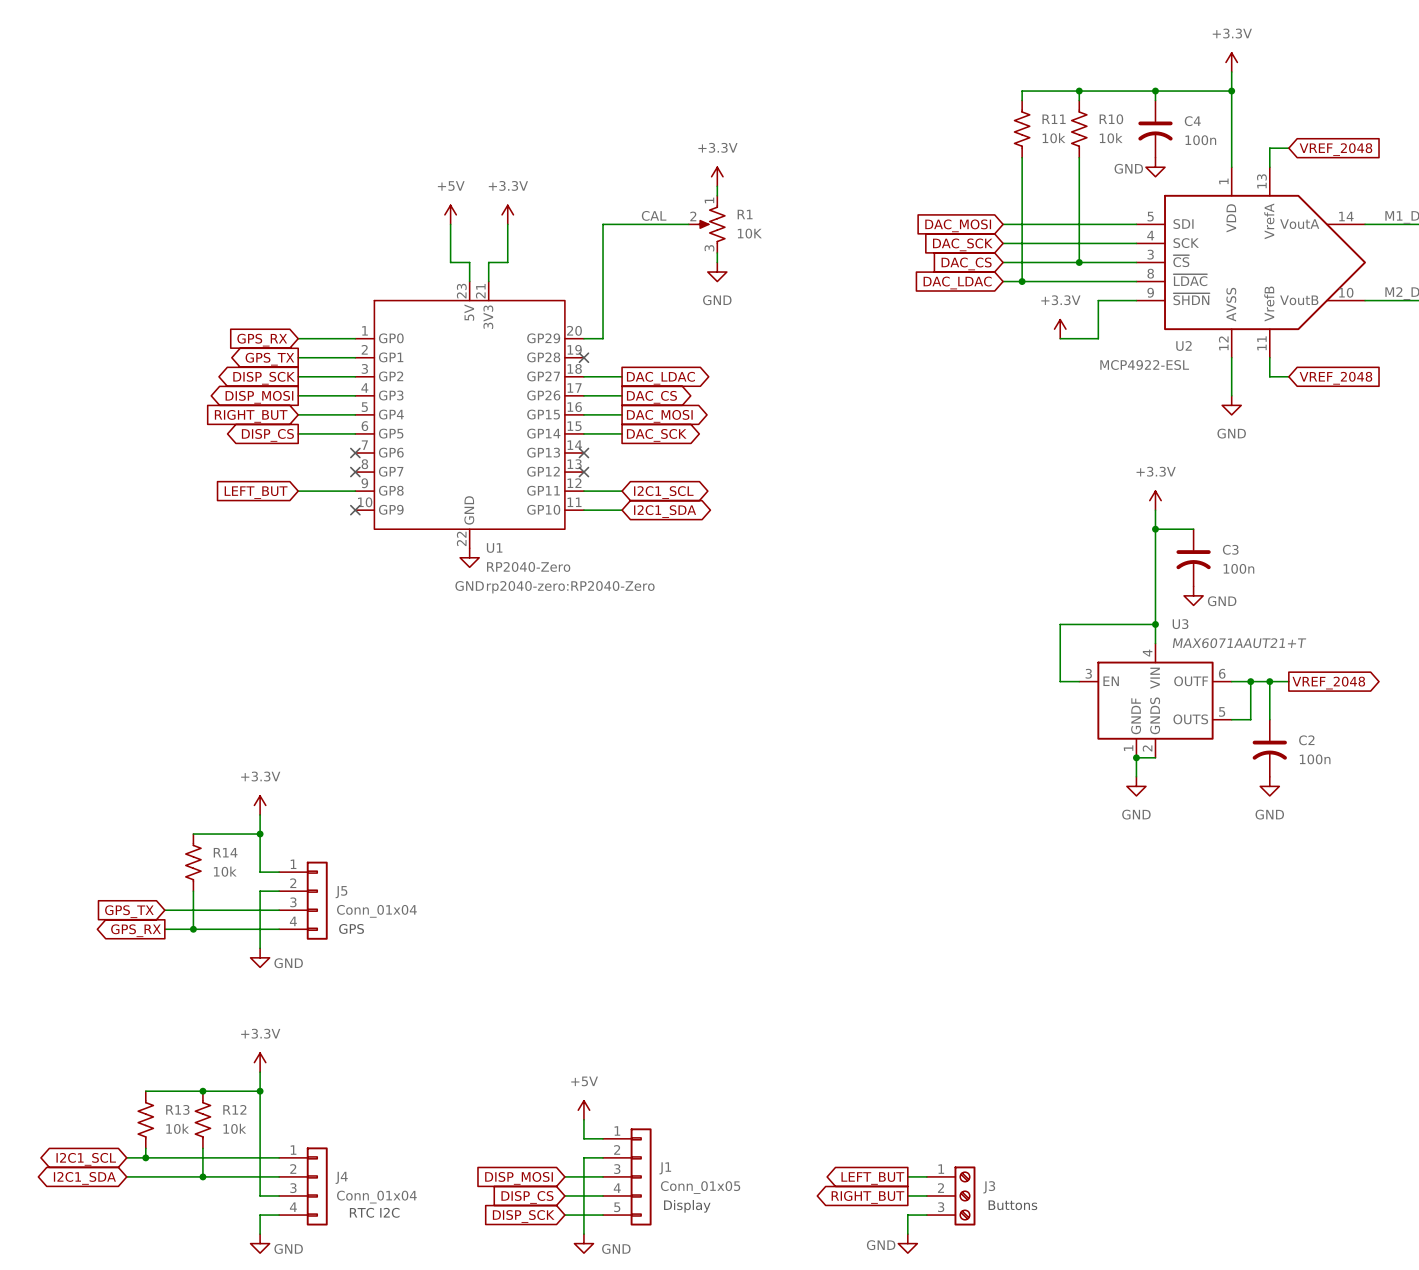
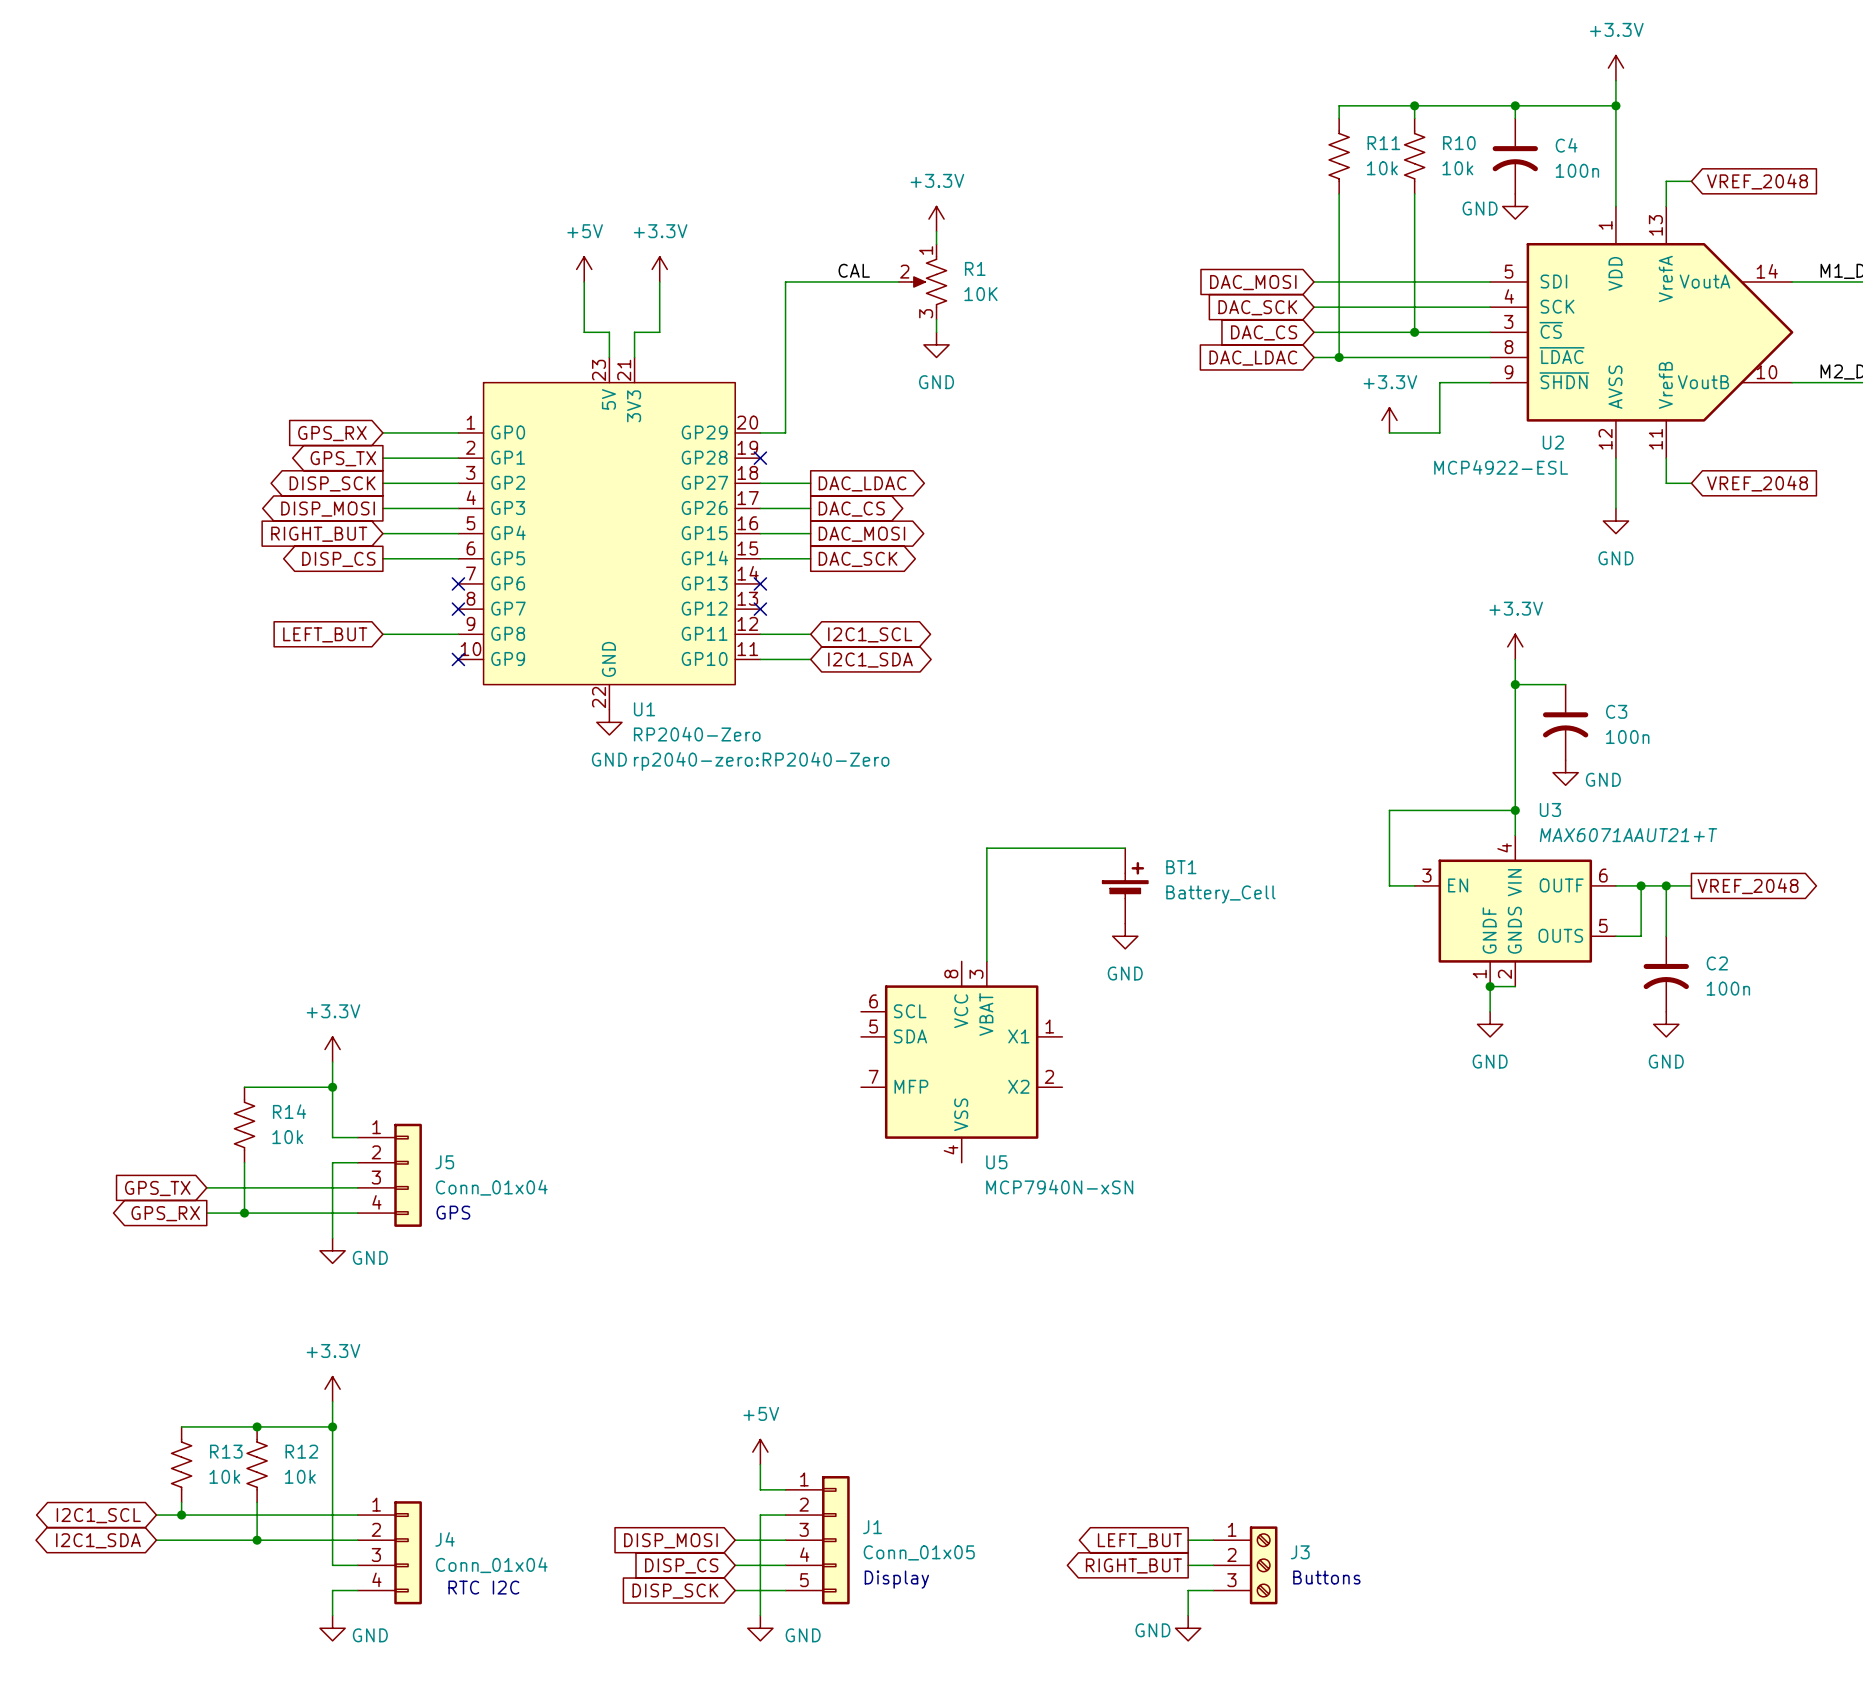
wire: none -> (1125, 848) (986, 848) (986, 961)
BT1: none -> Battery_Cell (1125, 885)
power symbol: none -> GND (1125, 936)
U5: none -> MCP7940N-xSN (961, 1062)

